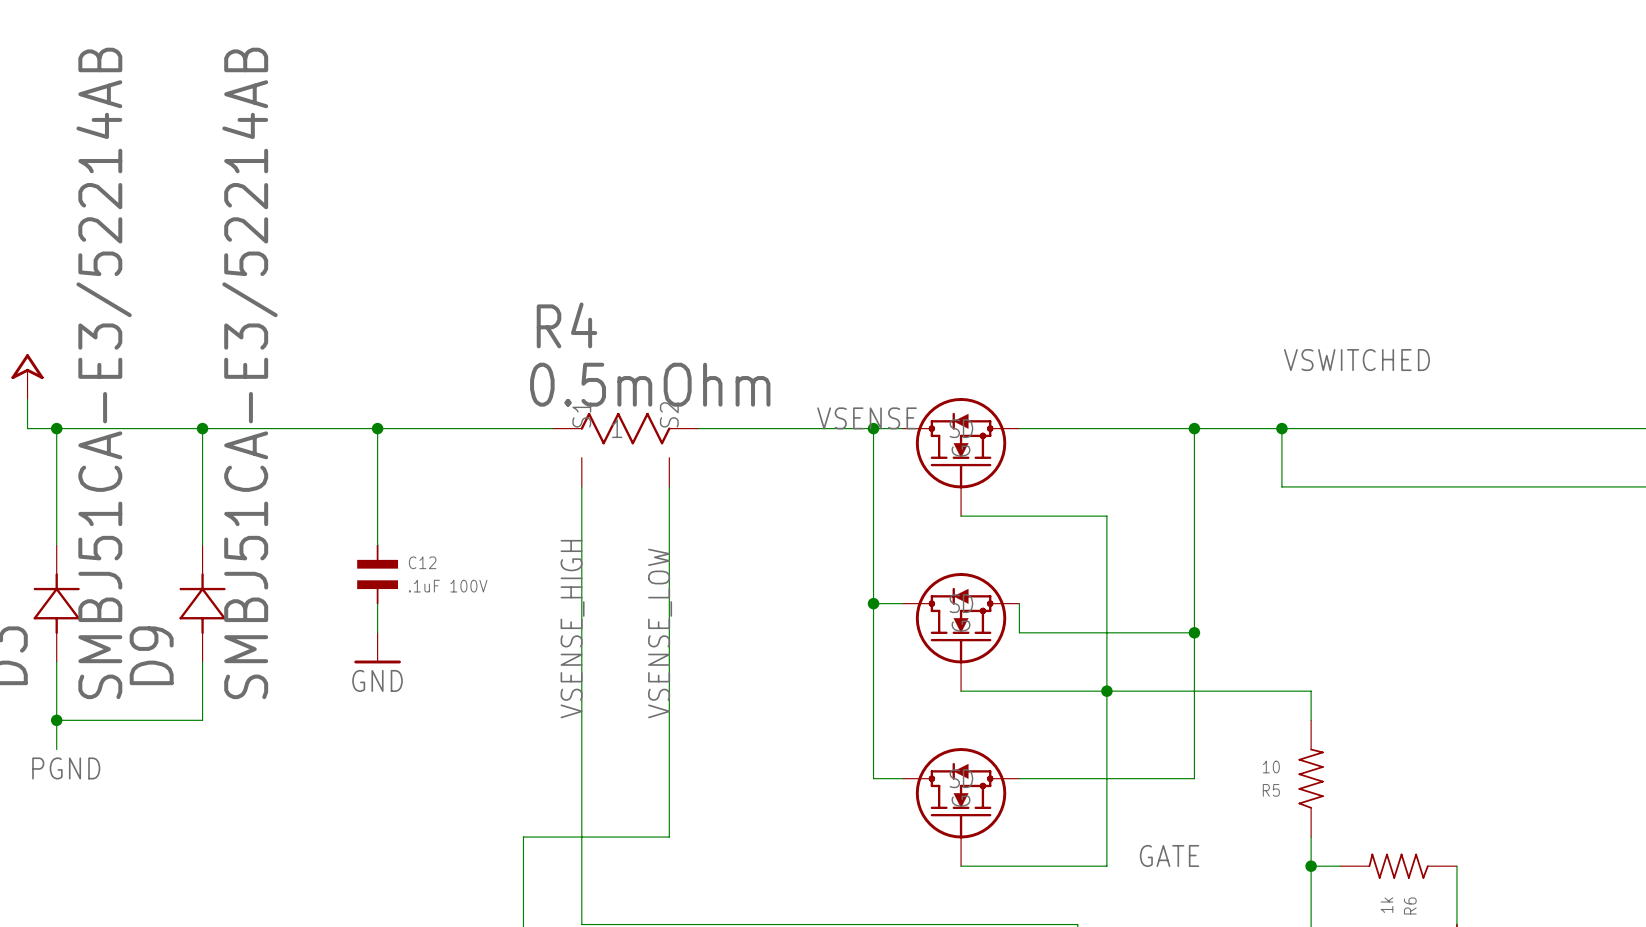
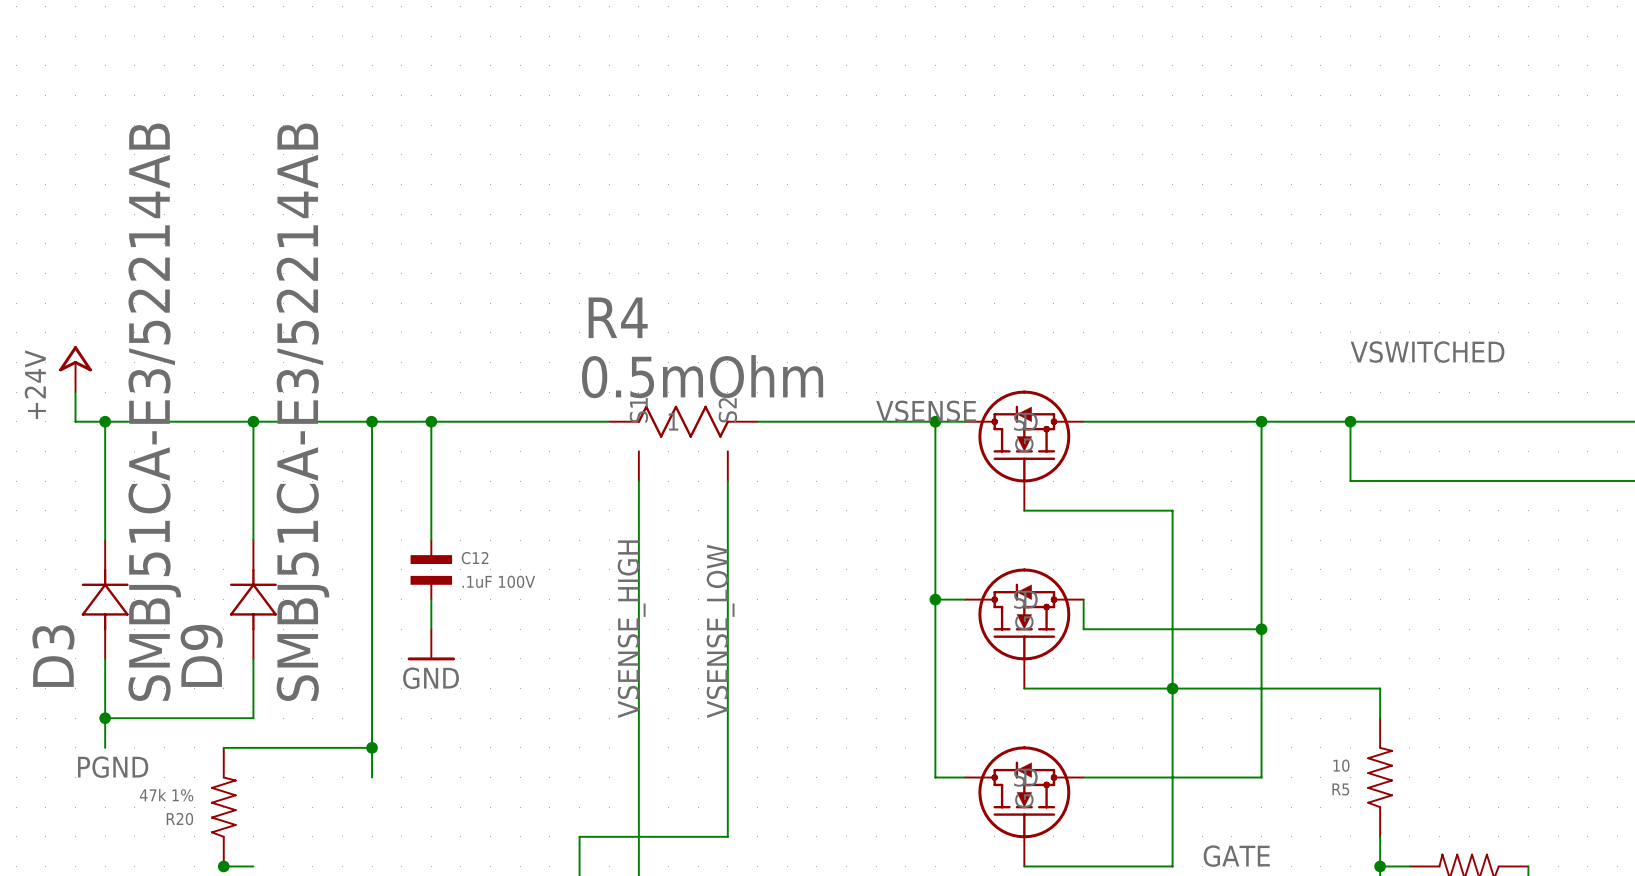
wire: none -> (372, 421) (372, 777)
junction: none -> (372, 421)
wire: none -> (223, 747) (372, 747)
junction: none -> (372, 747)
R20: none -> 47k 1% (223, 807)
wire: none -> (223, 866) (253, 866)
junction: none -> (223, 866)

